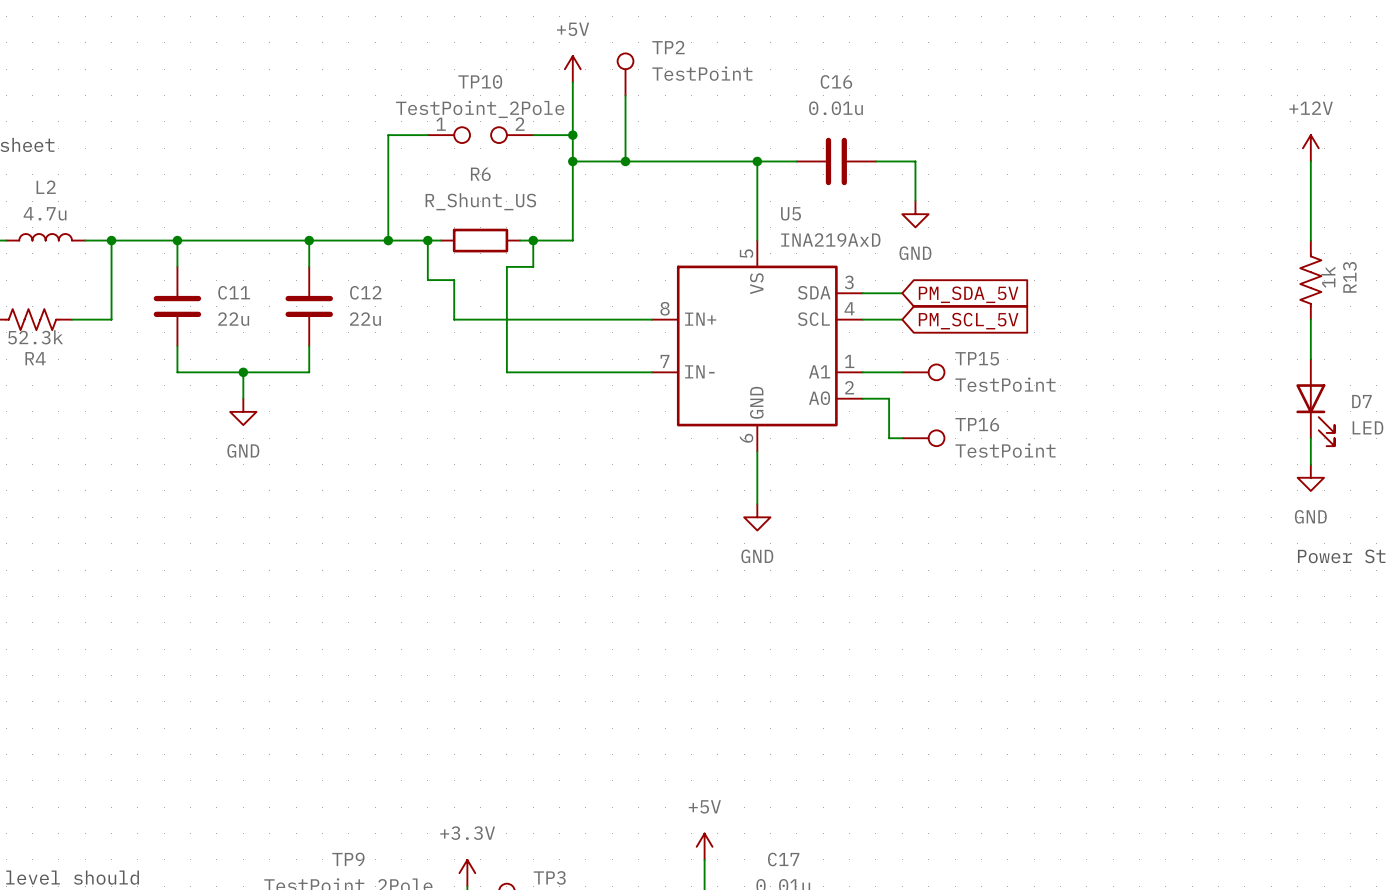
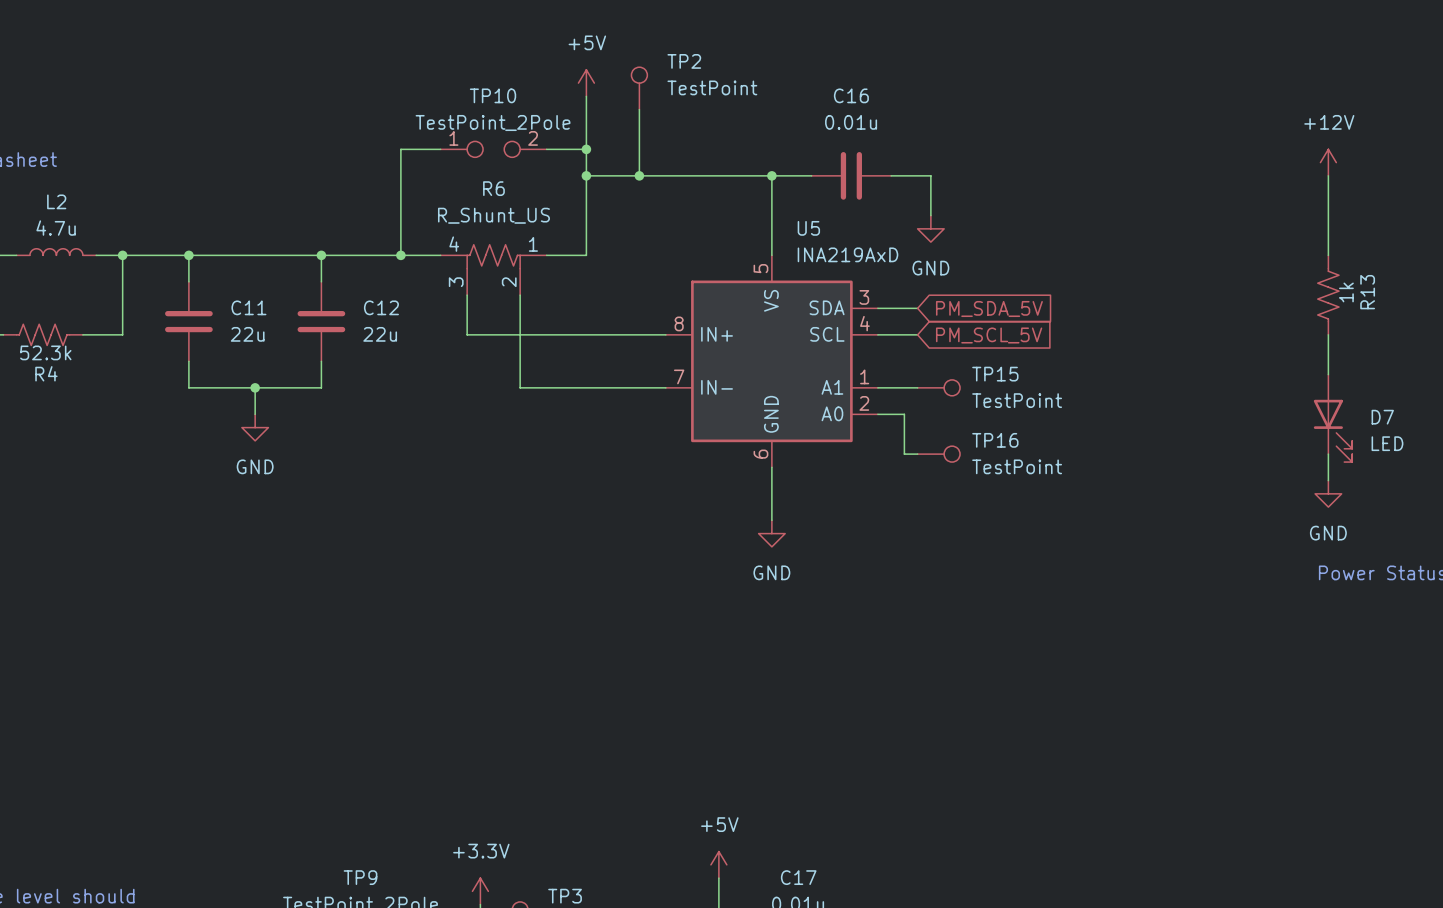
R6 symbol: [441, 228, 521, 253] -> [440, 244, 547, 296]
junction: (427, 240) -> none
wire: (441, 240) (427, 240) (427, 280) (454, 280) -> none
wire: (520, 240) (533, 240) (533, 266) (506, 266) (506, 280) -> none
junction: (533, 240) -> none

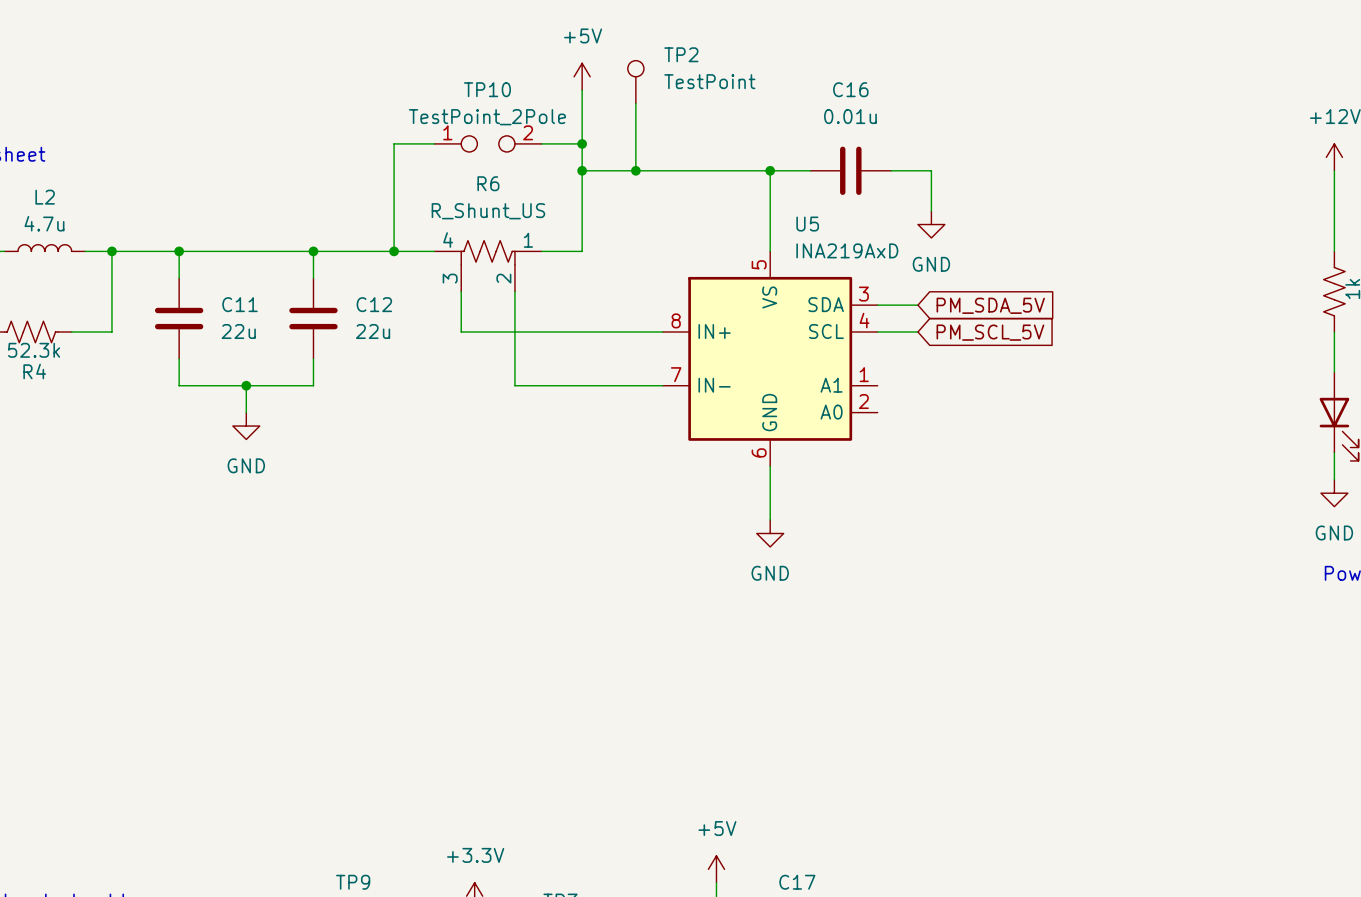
wire: (877, 387) (917, 387) -> none
TP15: TestPoint (938, 387) -> none
wire: (877, 414) (904, 414) (904, 454) (917, 454) -> none
TP16: TestPoint (938, 454) -> none

